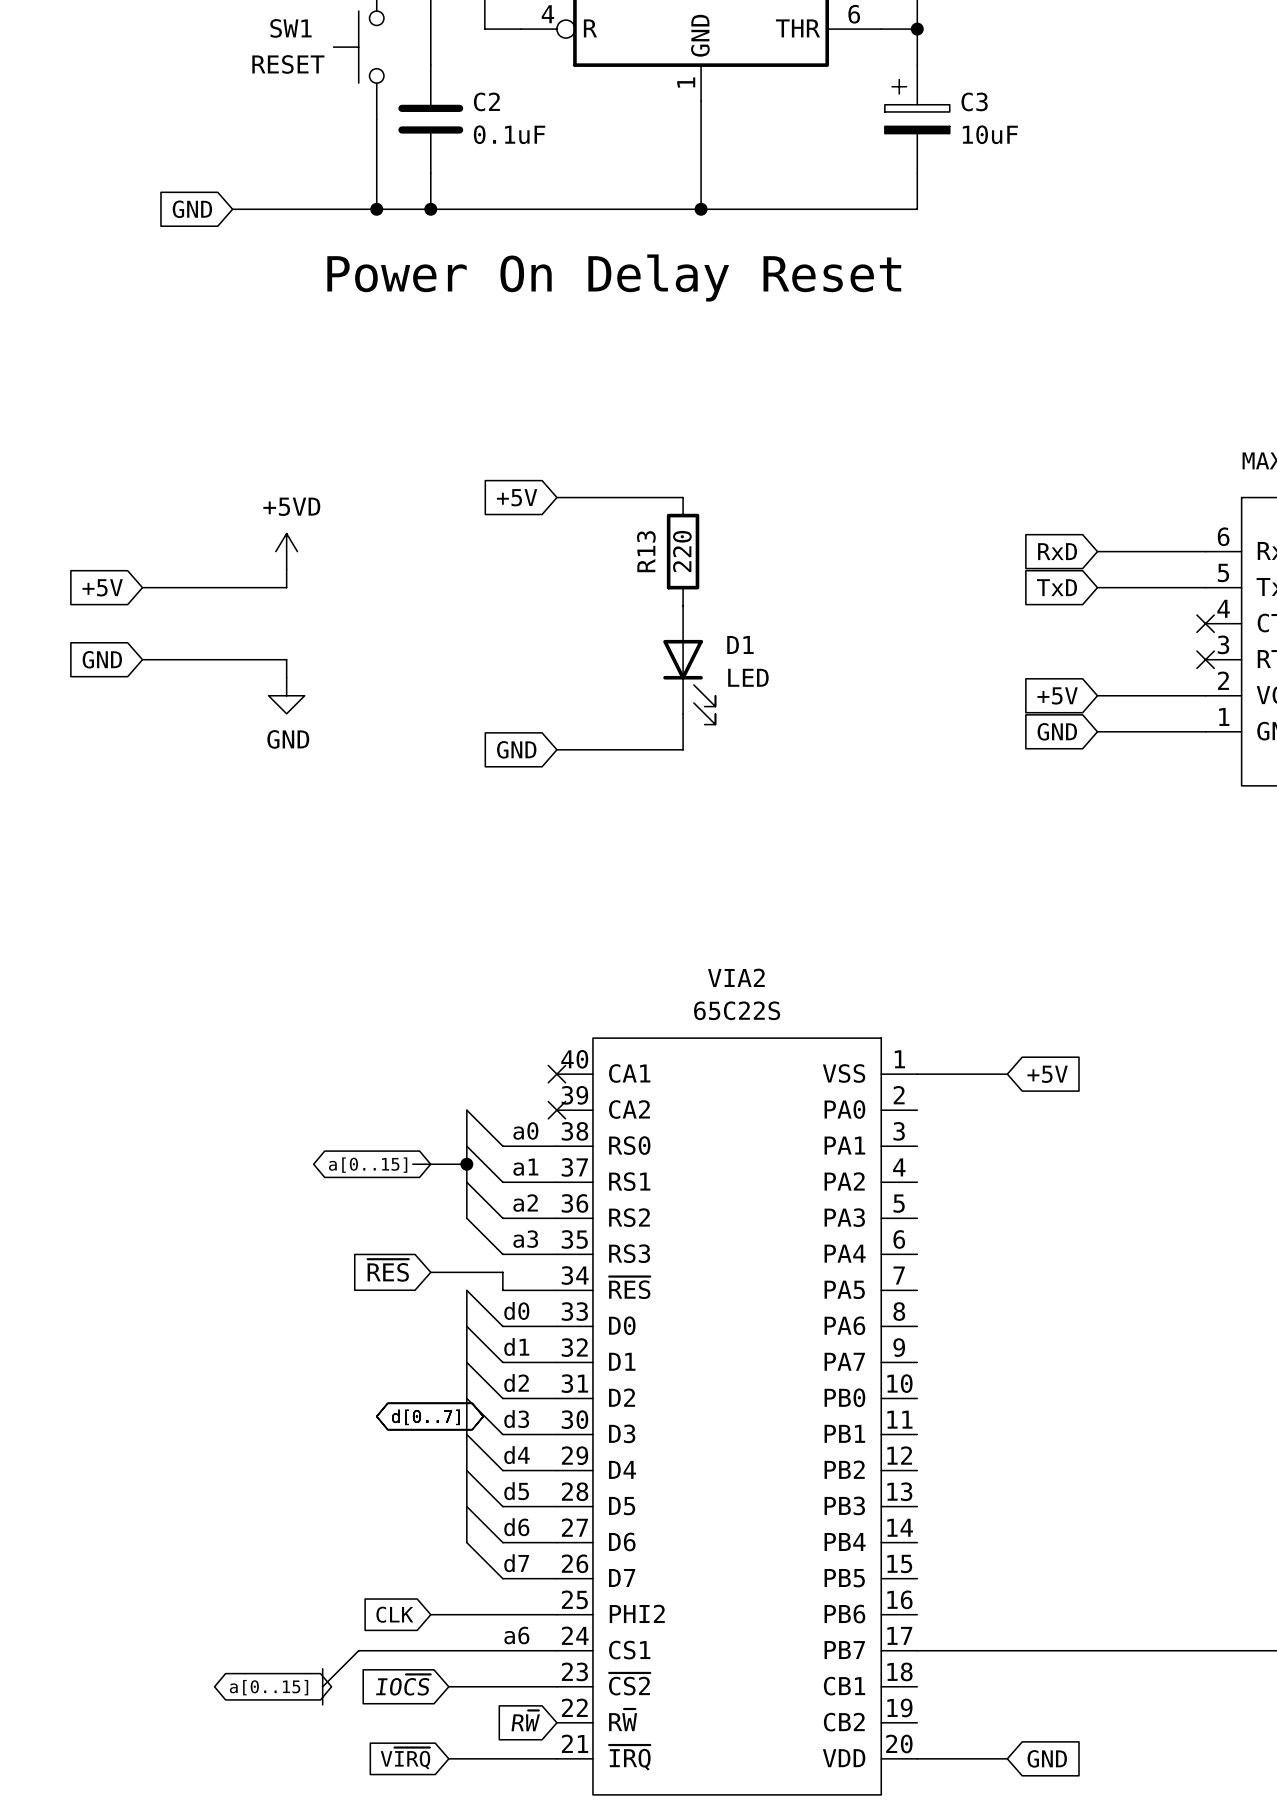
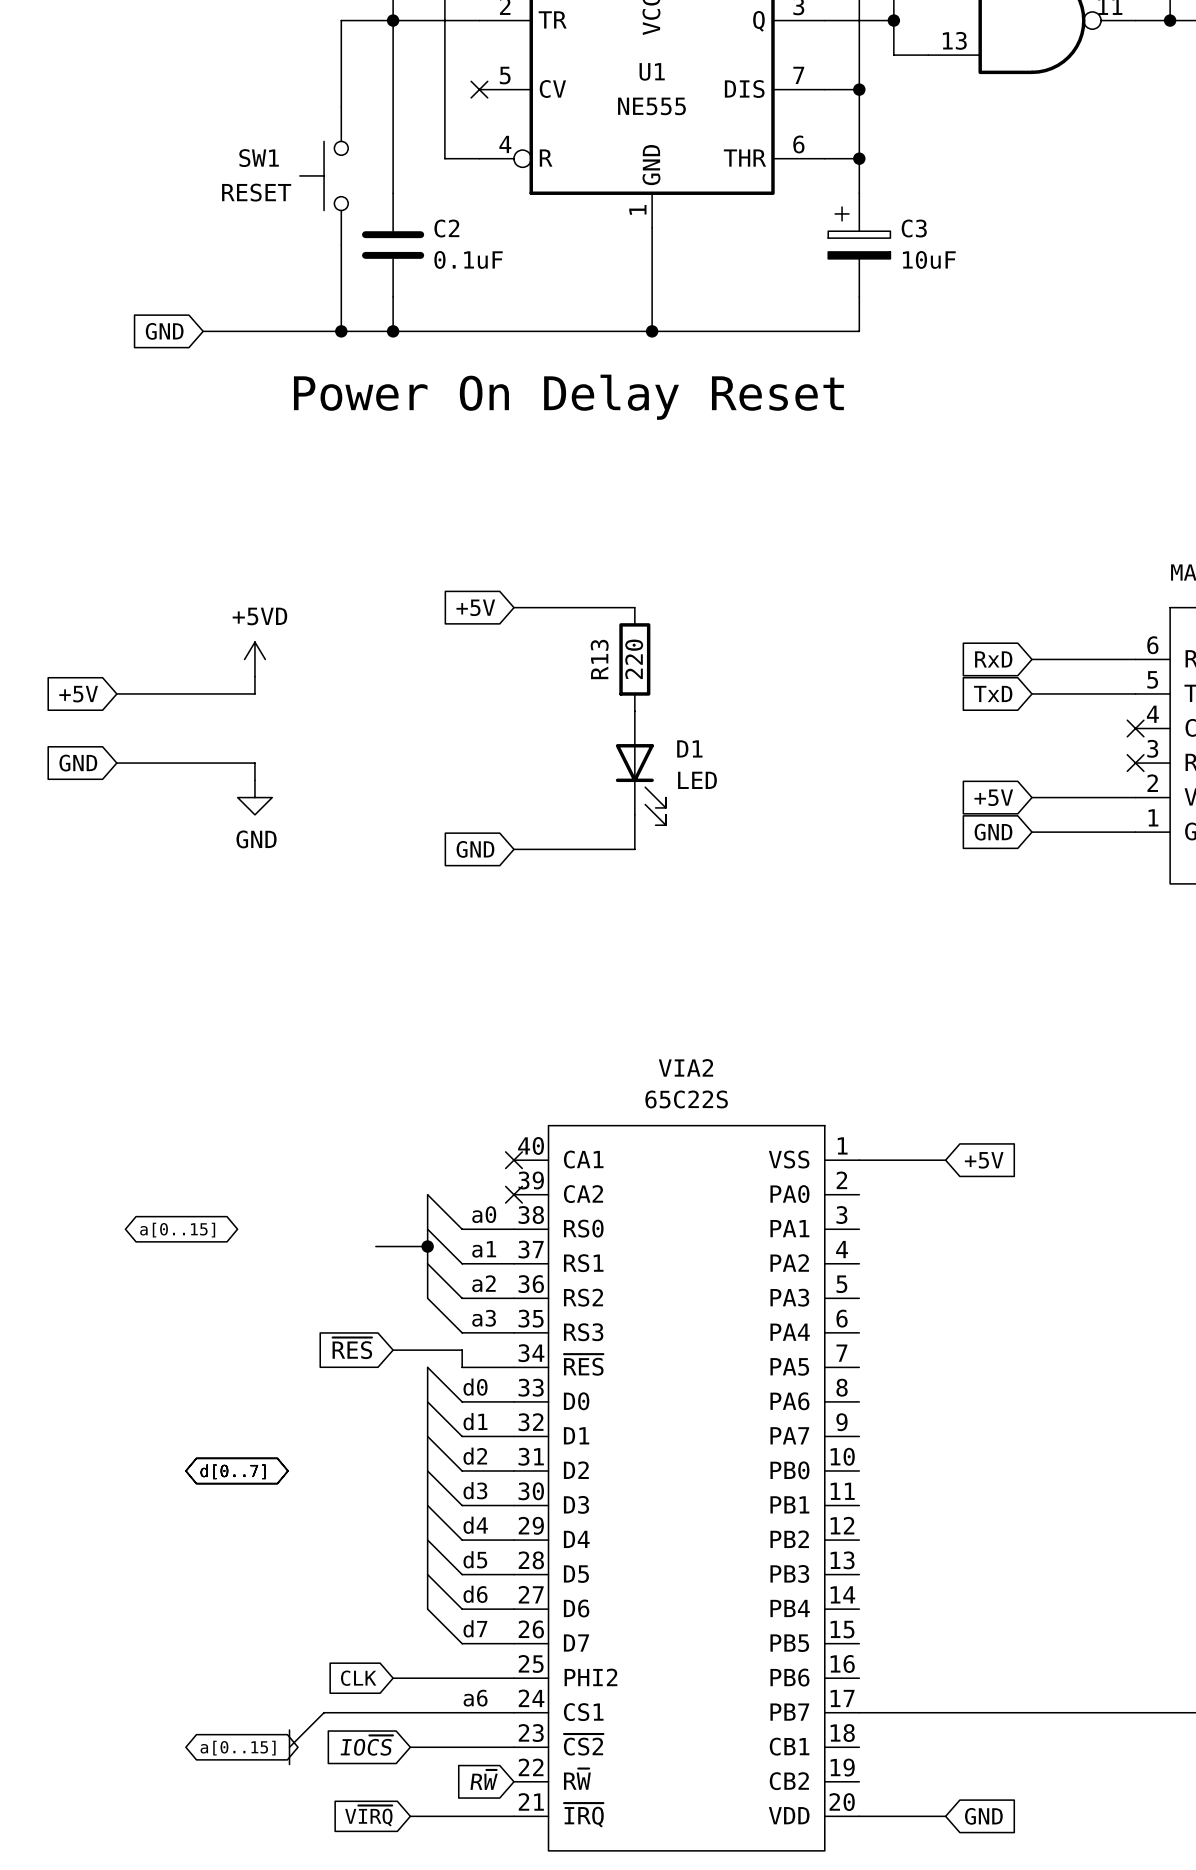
global label position: a[0..15] (368, 1165) -> a[0..15] (177, 1230)
global label position: d[0..7] (425, 1417) -> d[0..7] (233, 1471)

